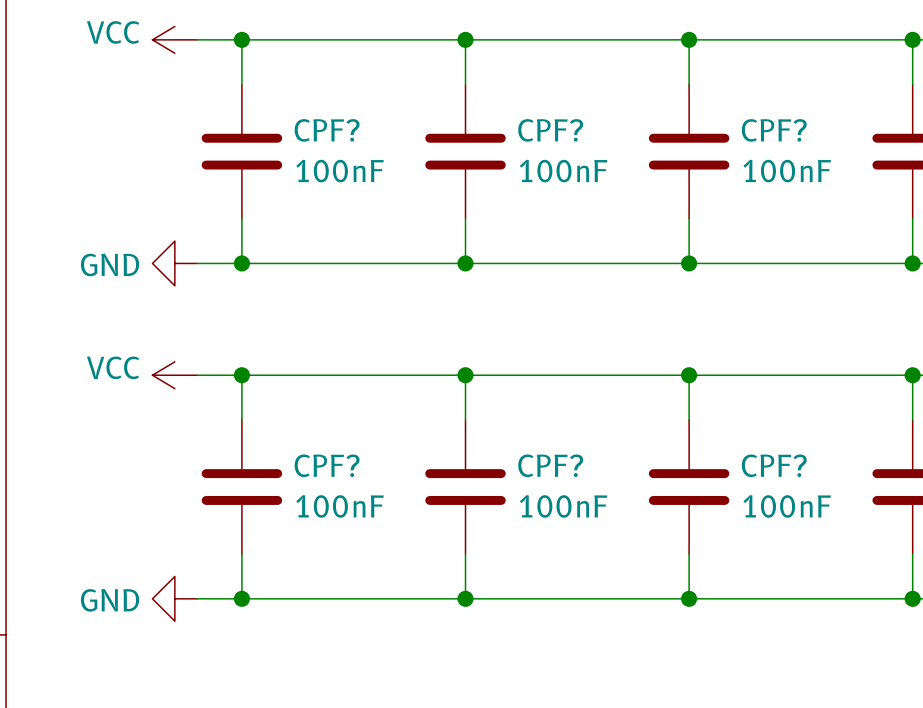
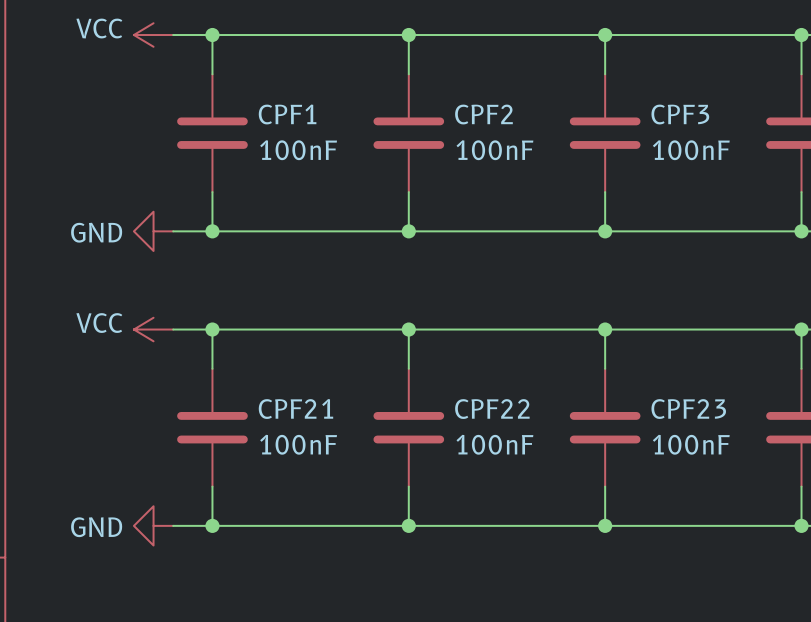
CPF? name: CPF? (327, 130) -> CPF1 (287, 114)
CPF? name: CPF? (550, 130) -> CPF2 (483, 114)
CPF? name: CPF? (774, 130) -> CPF3 (680, 114)
CPF? name: CPF? (327, 465) -> CPF21 (295, 409)
CPF? name: CPF? (550, 465) -> CPF22 (492, 409)
CPF? name: CPF? (774, 465) -> CPF23 (688, 409)

